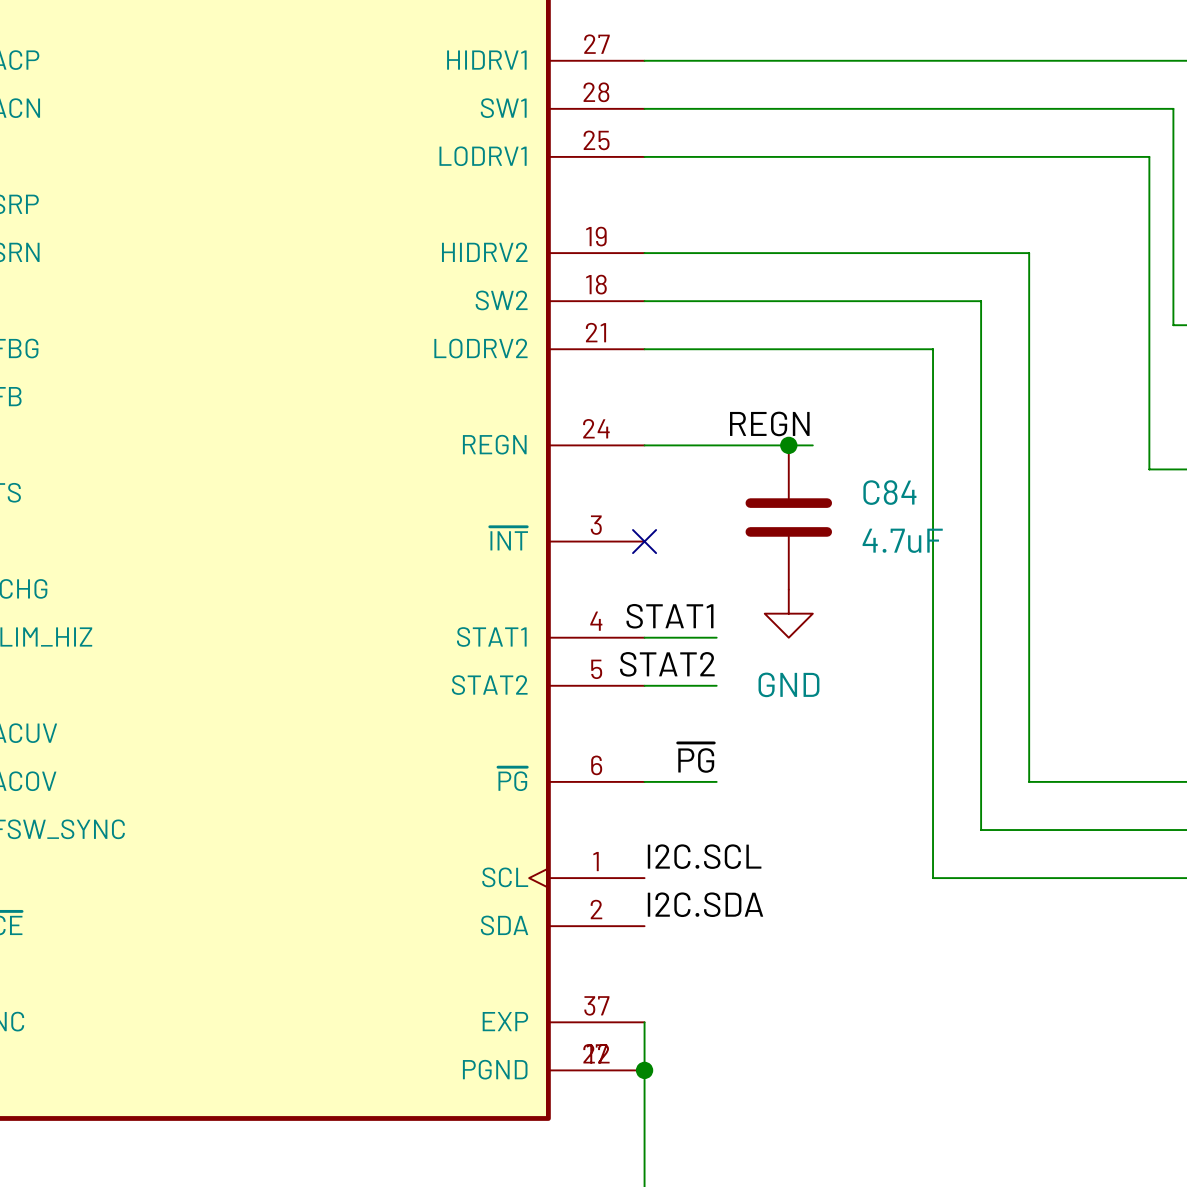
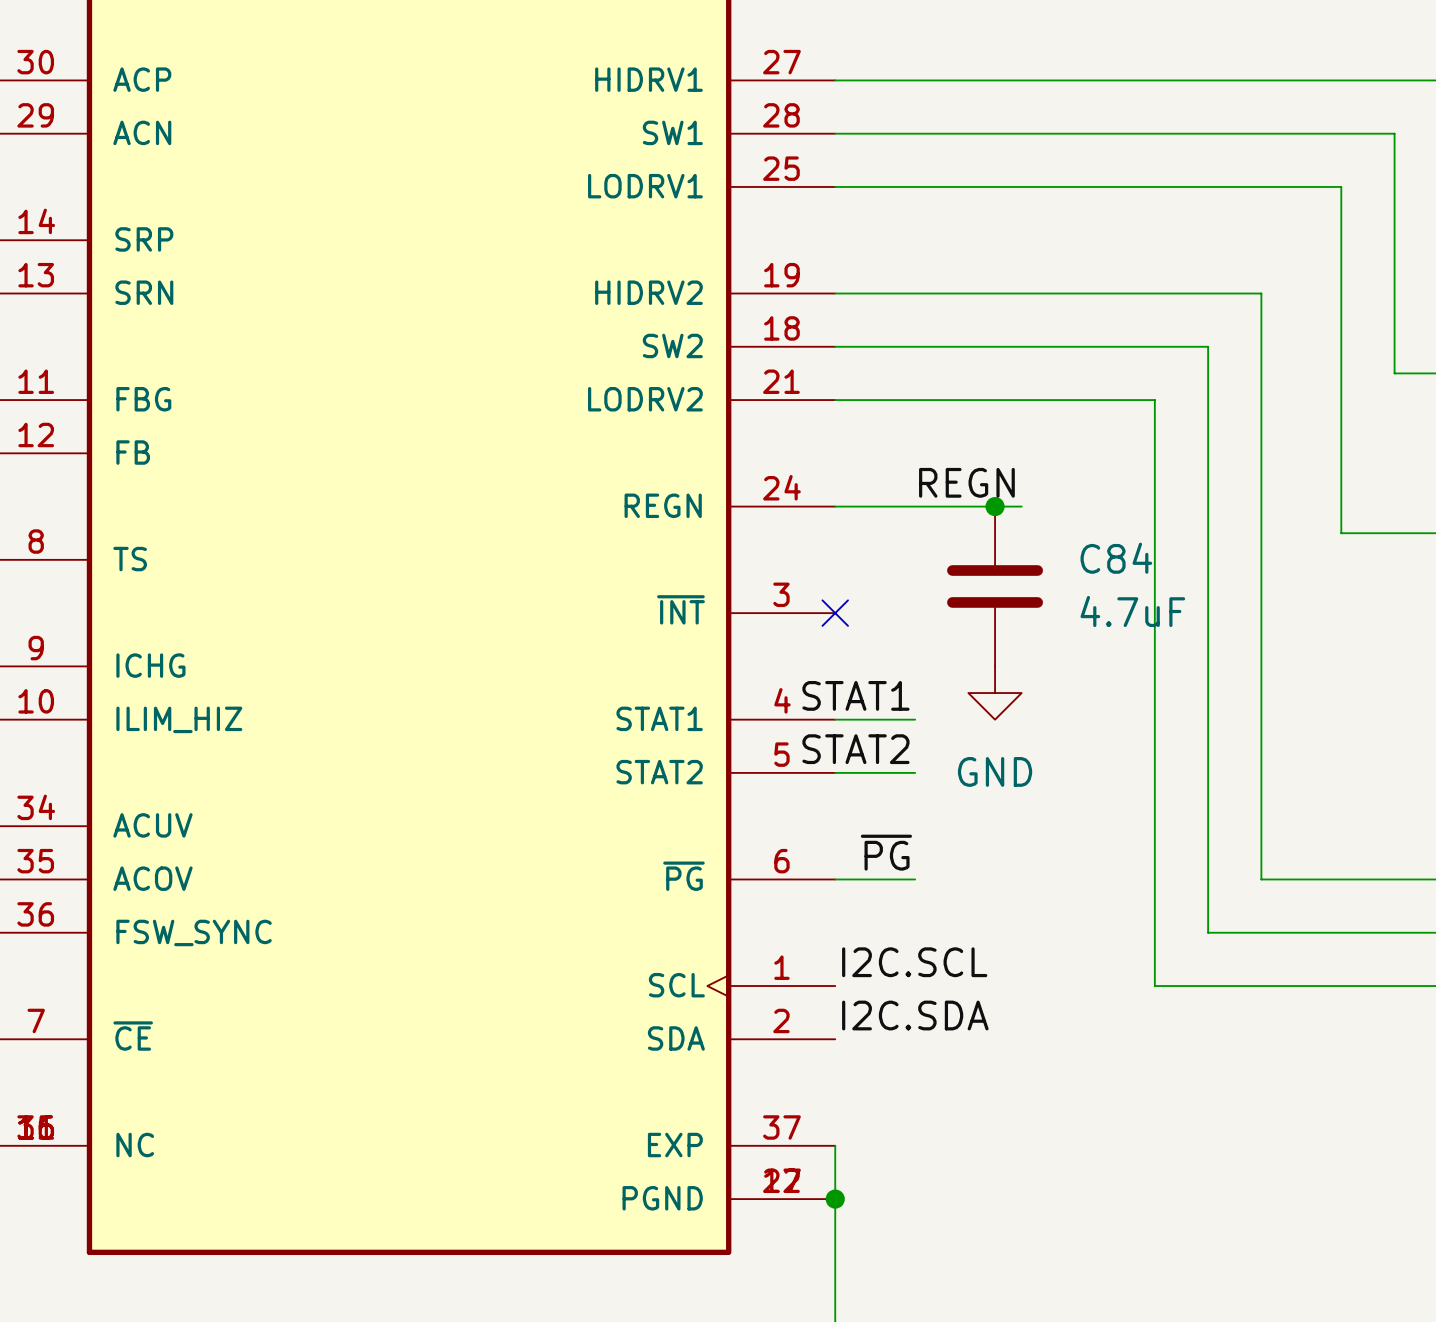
wire: (1149, 108) (1173, 108) (1173, 325) -> none
wire: (1101, 156) (1149, 156) -> (1394, 133) (1394, 186)
wire: none -> (1341, 186) (1341, 533) (1394, 533)
wire: (1149, 325) (1149, 469) -> (1394, 373) (1421, 373)

